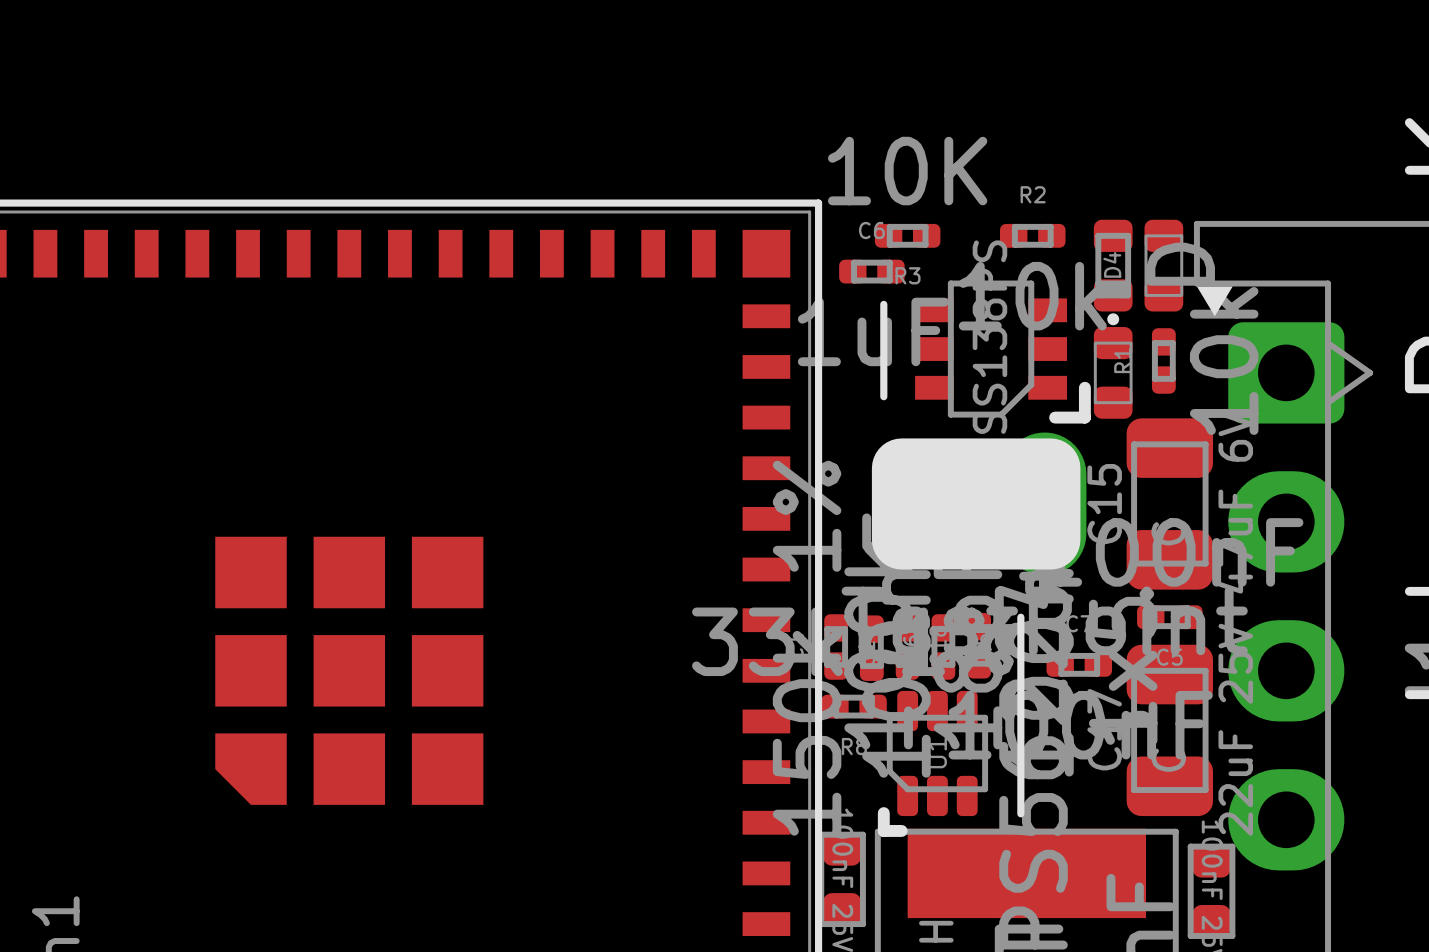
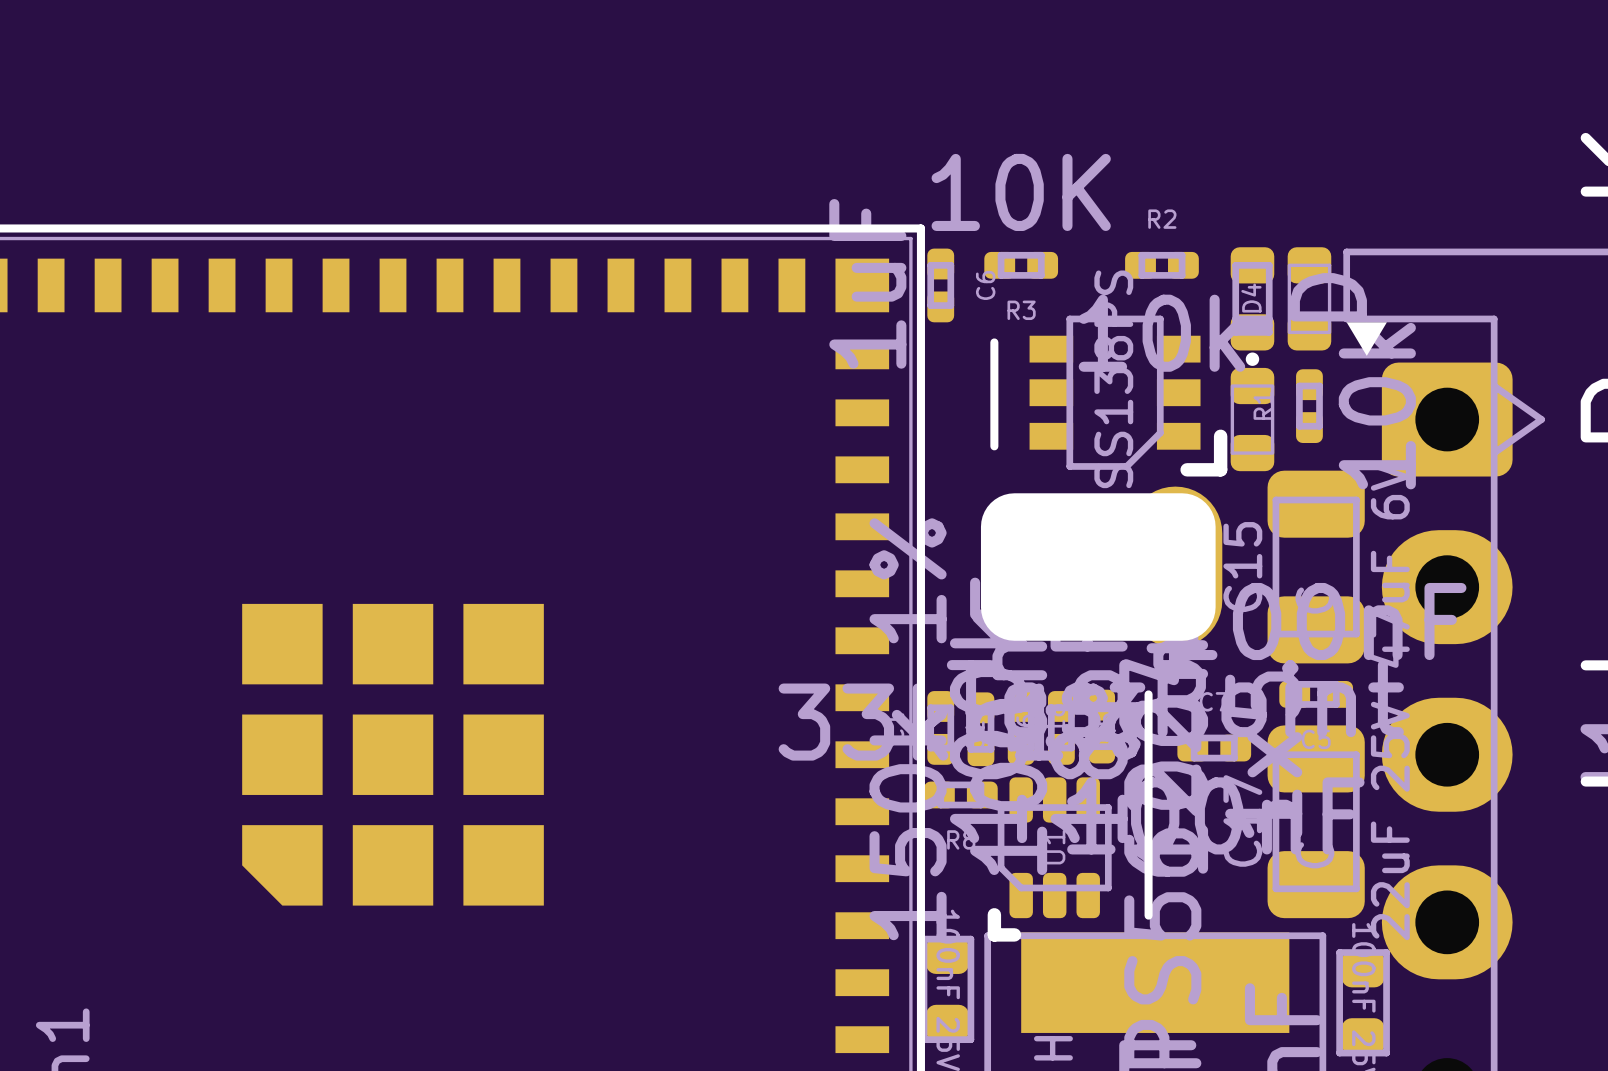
C6 rotation: 0° (871, 271) -> 90° clockwise (940, 285)
C6 position: (871, 271) -> (940, 285)

